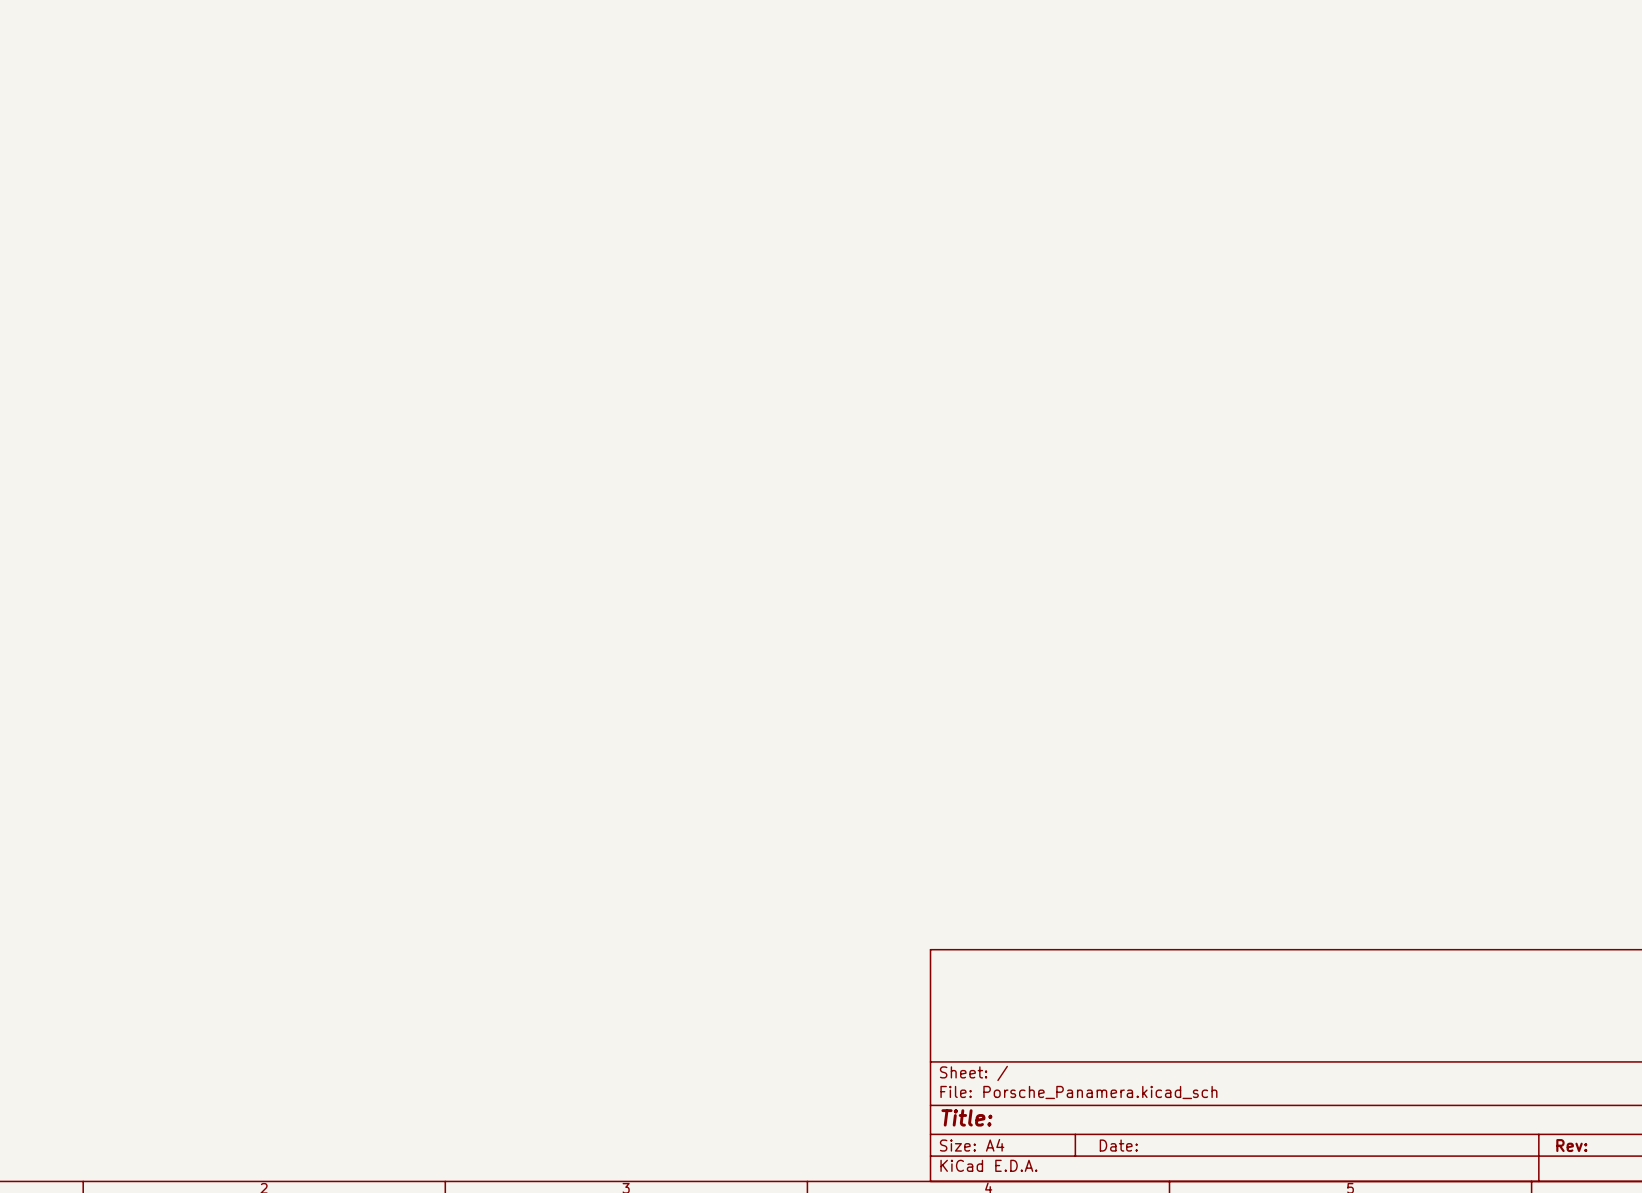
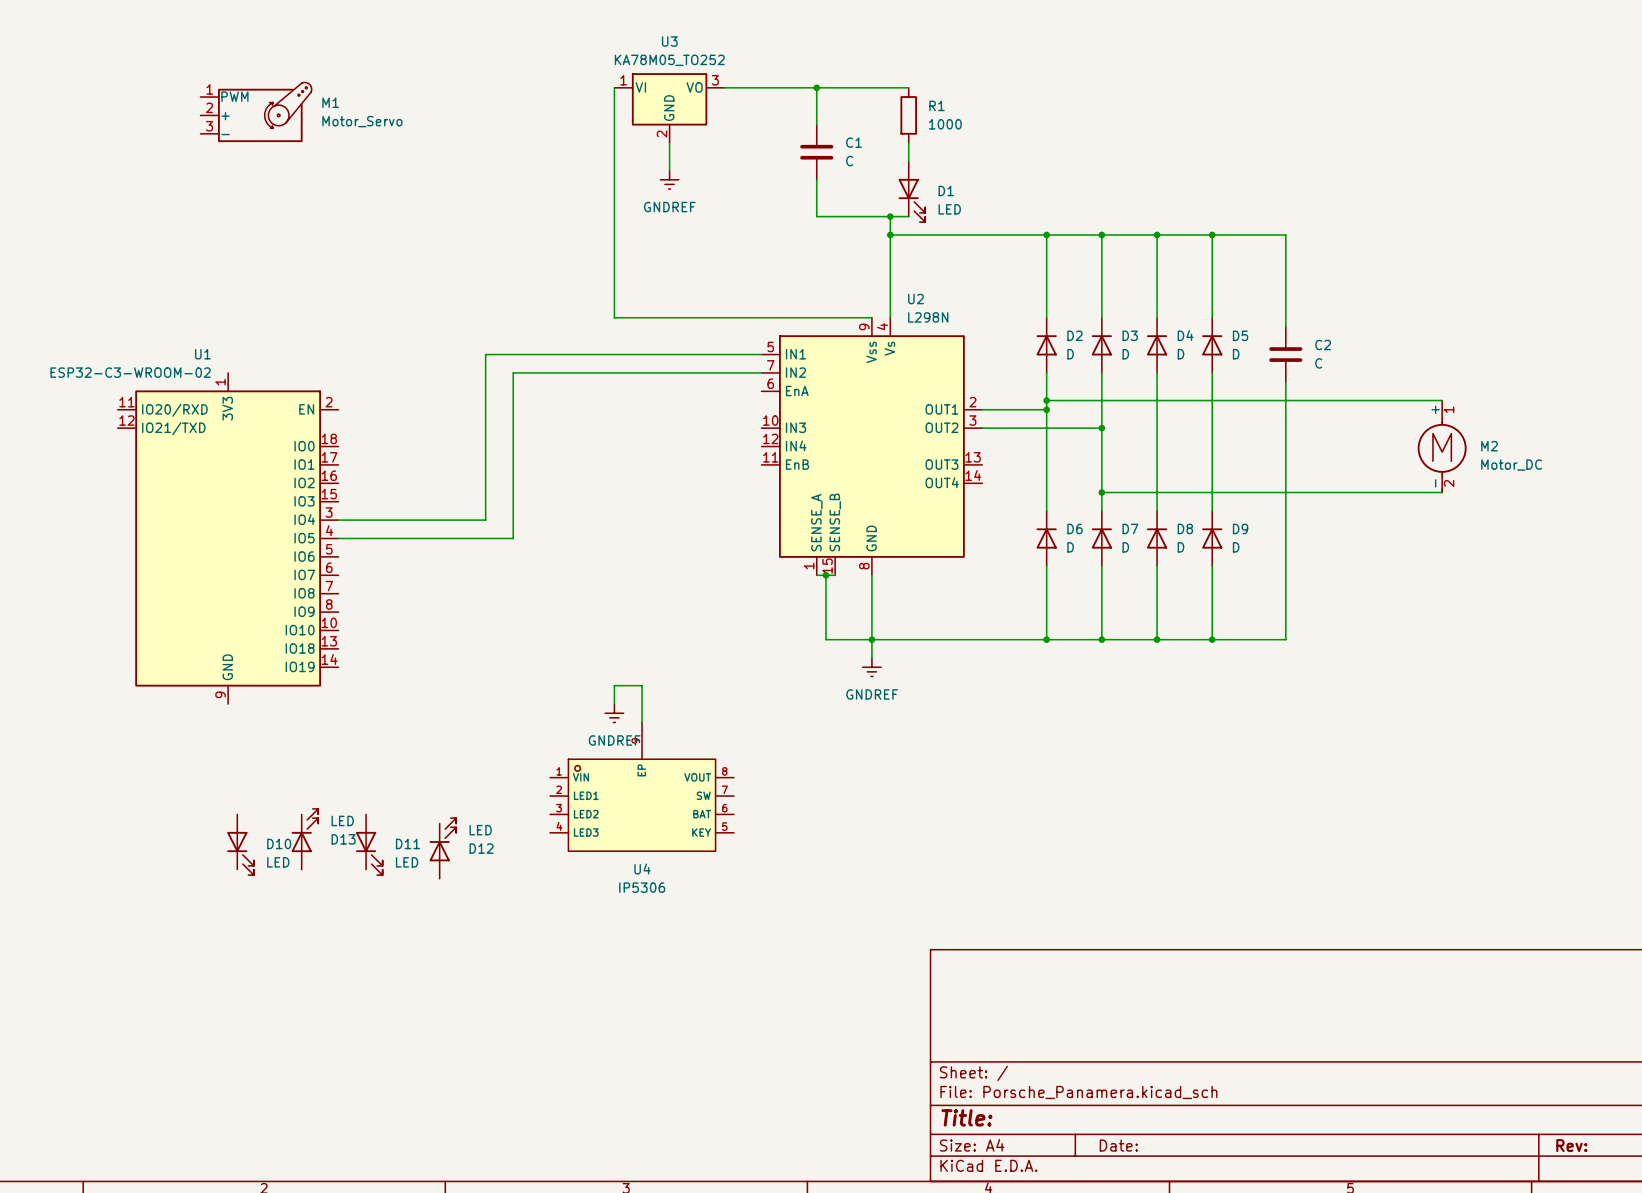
wire: none -> (614, 87) (614, 317) (871, 317)
wire: none -> (724, 87) (908, 87)
wire: none -> (816, 87) (816, 124)
junction: none -> (816, 87)
U3: none -> KA78M05_TO252 (669, 108)
M1: none -> Motor_Servo (256, 112)
R1: none -> 1000 (908, 115)
wire: none -> (669, 143) (669, 170)
wire: none -> (908, 143) (908, 161)
C1: none -> C (816, 152)
power symbol: none -> GNDREF (669, 179)
wire: none -> (816, 179) (816, 216) (908, 216)
D1: none -> LED (911, 191)
wire: none -> (890, 216) (890, 317)
junction: none -> (890, 216)
wire: none -> (890, 234) (1285, 234) (1285, 326)
junction: none -> (890, 234)
wire: none -> (1046, 234) (1046, 317)
junction: none -> (1046, 234)
wire: none -> (1101, 234) (1101, 317)
junction: none -> (1101, 234)
wire: none -> (1157, 234) (1157, 317)
junction: none -> (1157, 234)
wire: none -> (1212, 234) (1212, 317)
junction: none -> (1212, 234)
D2: none -> D (1046, 345)
D3: none -> D (1101, 345)
D4: none -> D (1157, 345)
D5: none -> D (1212, 345)
wire: none -> (761, 354) (485, 354) (485, 520) (338, 520)
C2: none -> C (1285, 354)
wire: none -> (761, 372) (513, 372) (513, 538) (338, 538)
wire: none -> (1046, 372) (1046, 510)
wire: none -> (1101, 372) (1101, 510)
wire: none -> (1157, 372) (1157, 510)
wire: none -> (1212, 372) (1212, 510)
wire: none -> (1285, 382) (1285, 639) (825, 639) (825, 575)
wire: none -> (1046, 400) (1442, 400)
junction: none -> (1046, 400)
wire: none -> (982, 409) (1046, 409)
junction: none -> (1046, 409)
wire: none -> (982, 428) (1101, 428)
junction: none -> (1101, 428)
U2: none -> L298N (871, 446)
M2: none -> Motor_DC (1442, 446)
wire: none -> (1101, 492) (1442, 492)
junction: none -> (1101, 492)
U1: none -> ESP32-C3-WROOM-02 (228, 538)
D6: none -> D (1046, 538)
D7: none -> D (1101, 538)
D8: none -> D (1157, 538)
D9: none -> D (1212, 538)
wire: none -> (1046, 566) (1046, 639)
wire: none -> (1101, 566) (1101, 639)
wire: none -> (1157, 566) (1157, 639)
wire: none -> (1212, 566) (1212, 639)
wire: none -> (816, 575) (835, 575)
junction: none -> (825, 575)
wire: none -> (871, 575) (871, 658)
junction: none -> (871, 639)
junction: none -> (1046, 639)
junction: none -> (1101, 639)
junction: none -> (1157, 639)
junction: none -> (1212, 639)
power symbol: none -> GNDREF (871, 667)
wire: none -> (614, 704) (614, 685) (641, 685) (641, 722)
power symbol: none -> GNDREF (614, 713)
U4: none -> IP5306 (641, 786)
D13: none -> LED (304, 839)
D10: none -> LED (240, 844)
D11: none -> LED (369, 844)
D12: none -> LED (442, 848)

